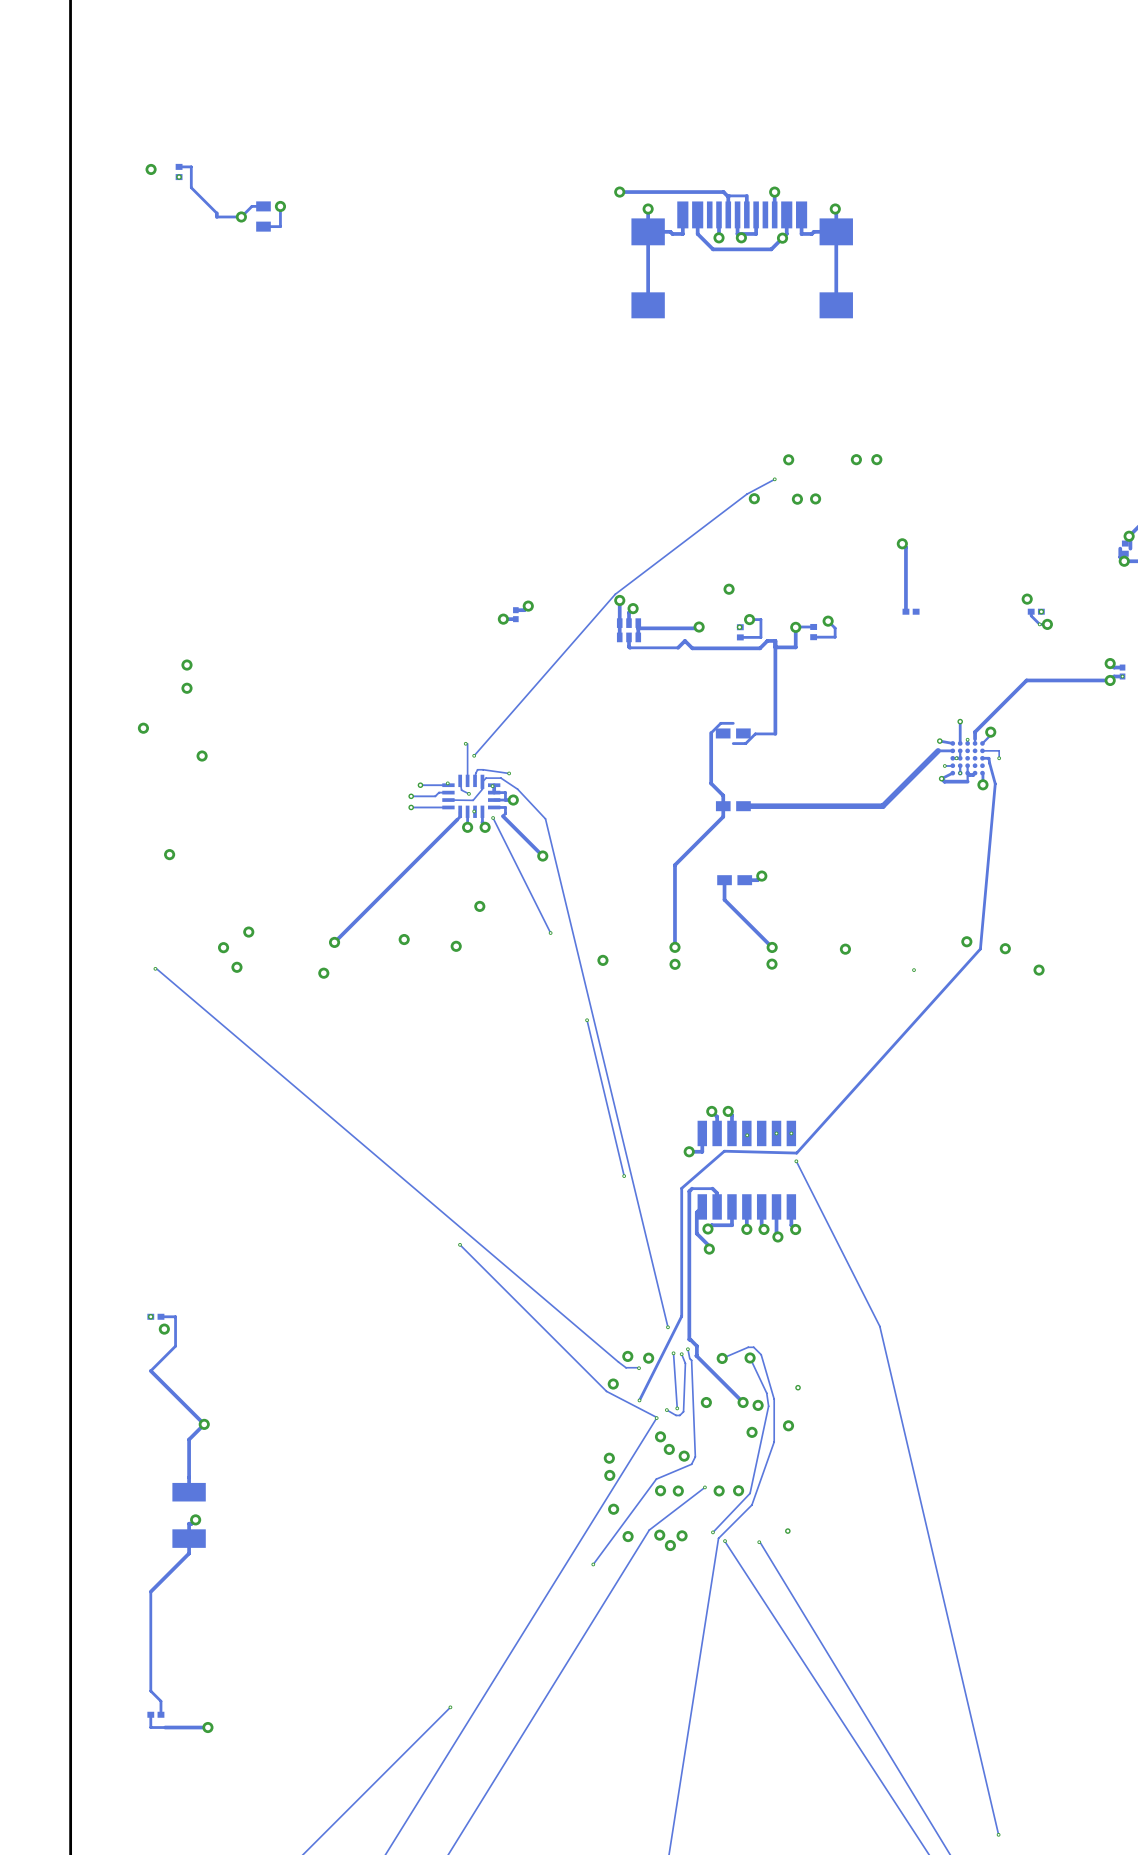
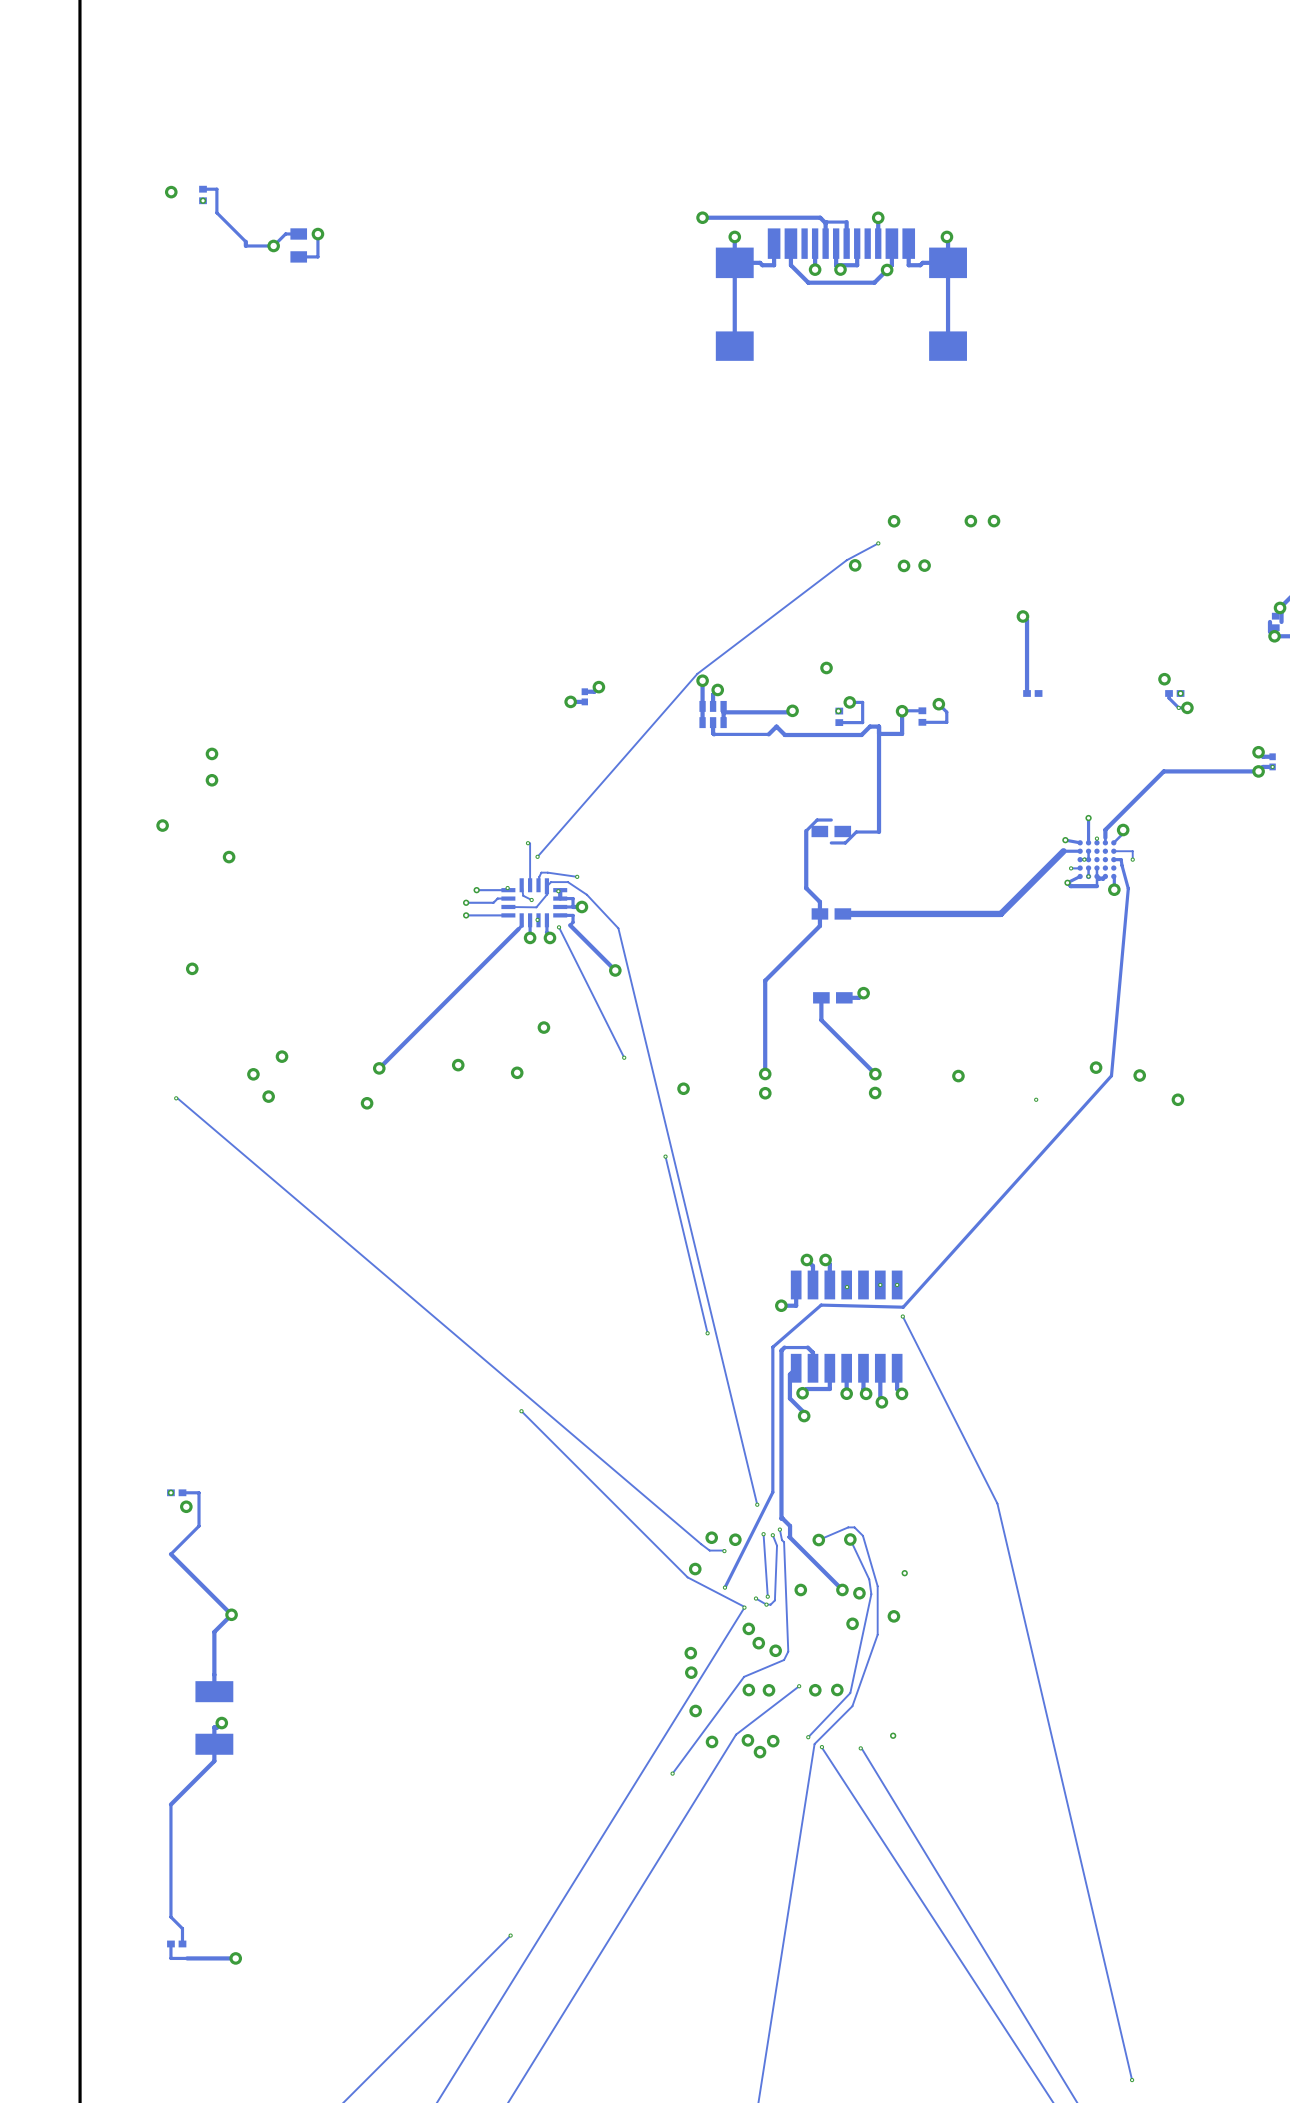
via: none -> (766, 1604)

